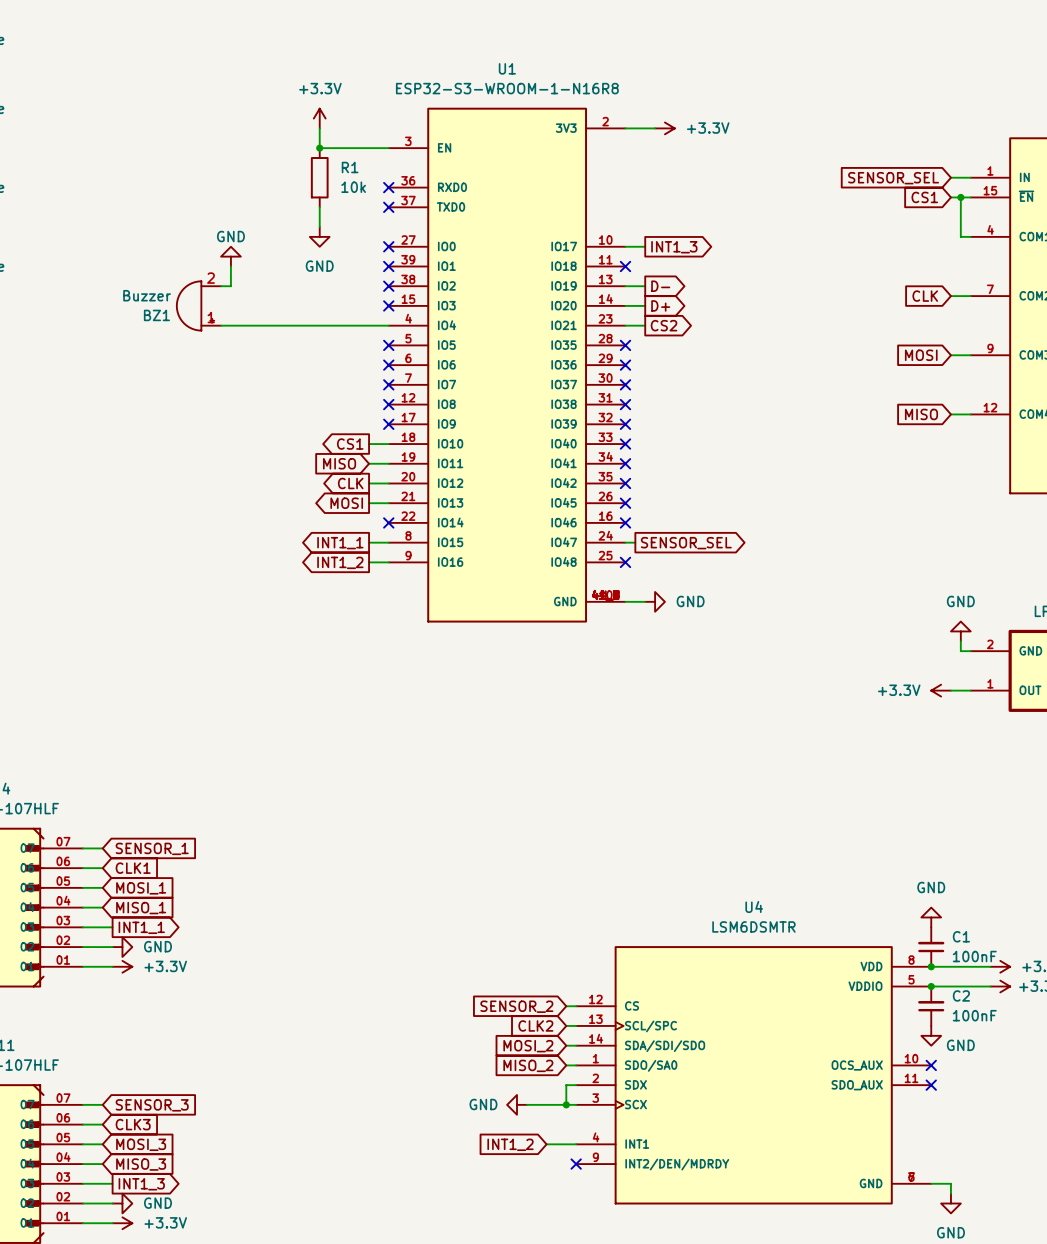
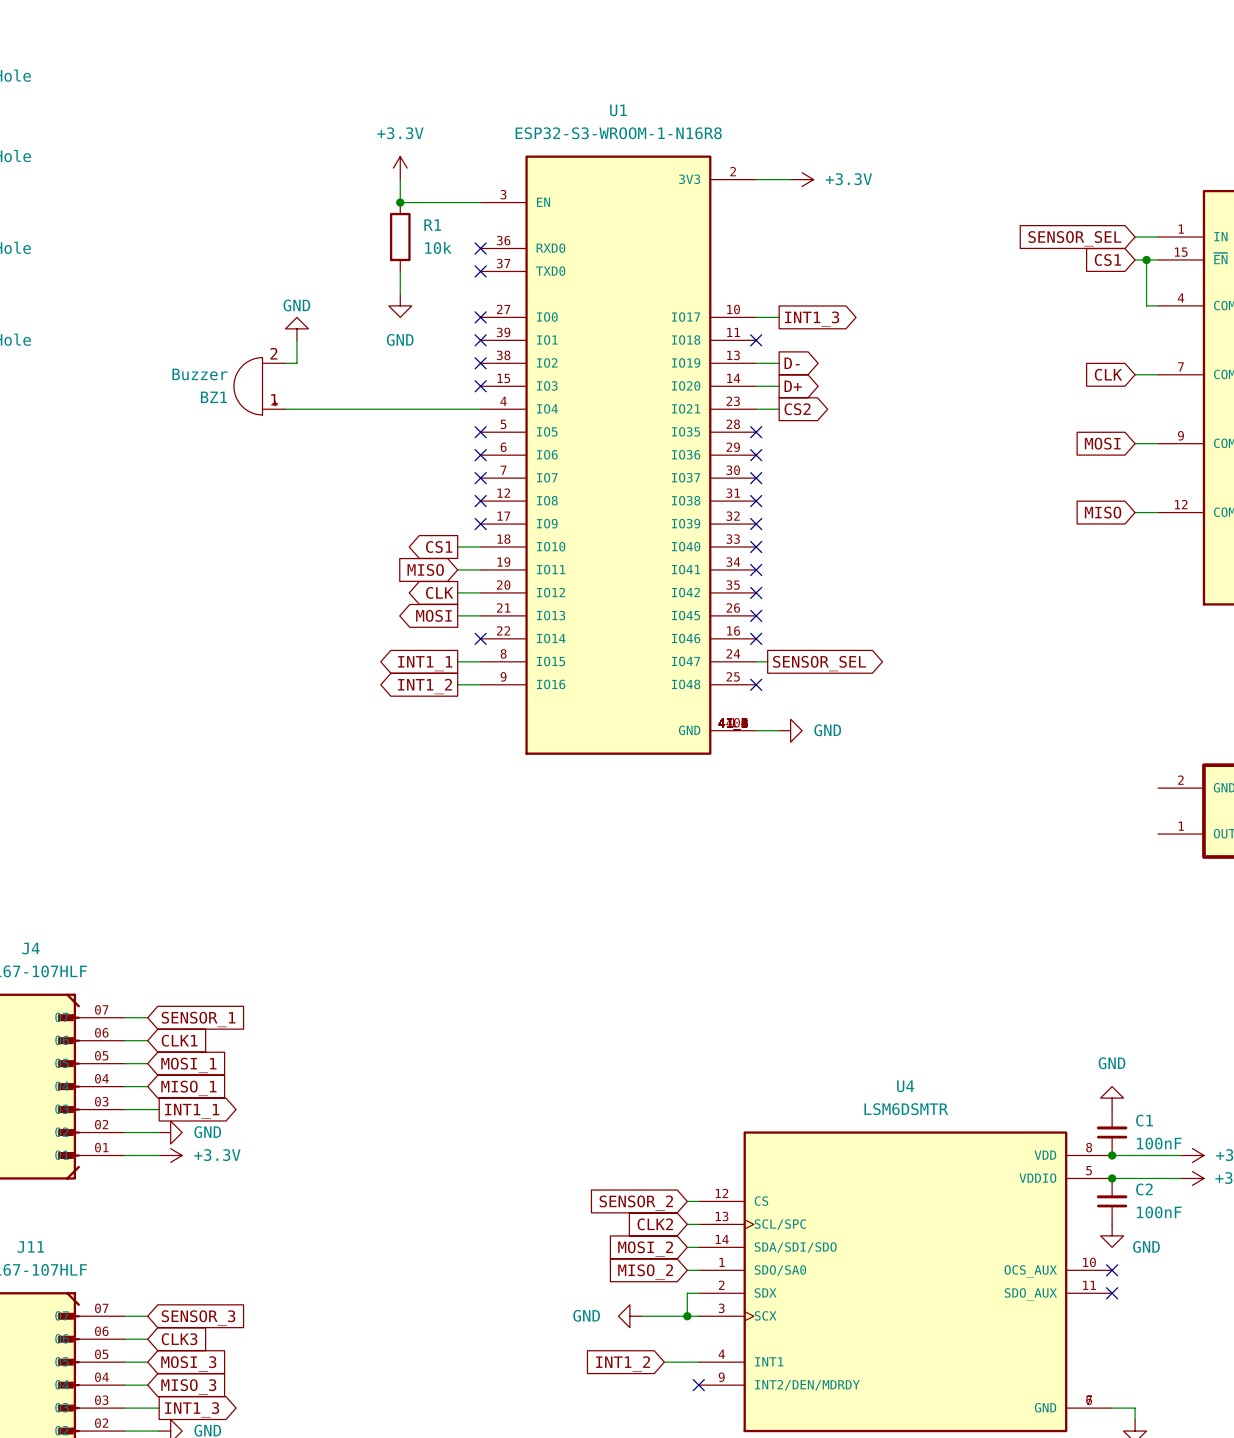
power symbol: GND (960, 631) -> none
wire: (960, 641) (960, 651) (970, 651) -> none
power symbol: +3.3V (941, 690) -> none
wire: (950, 690) (970, 690) -> none

